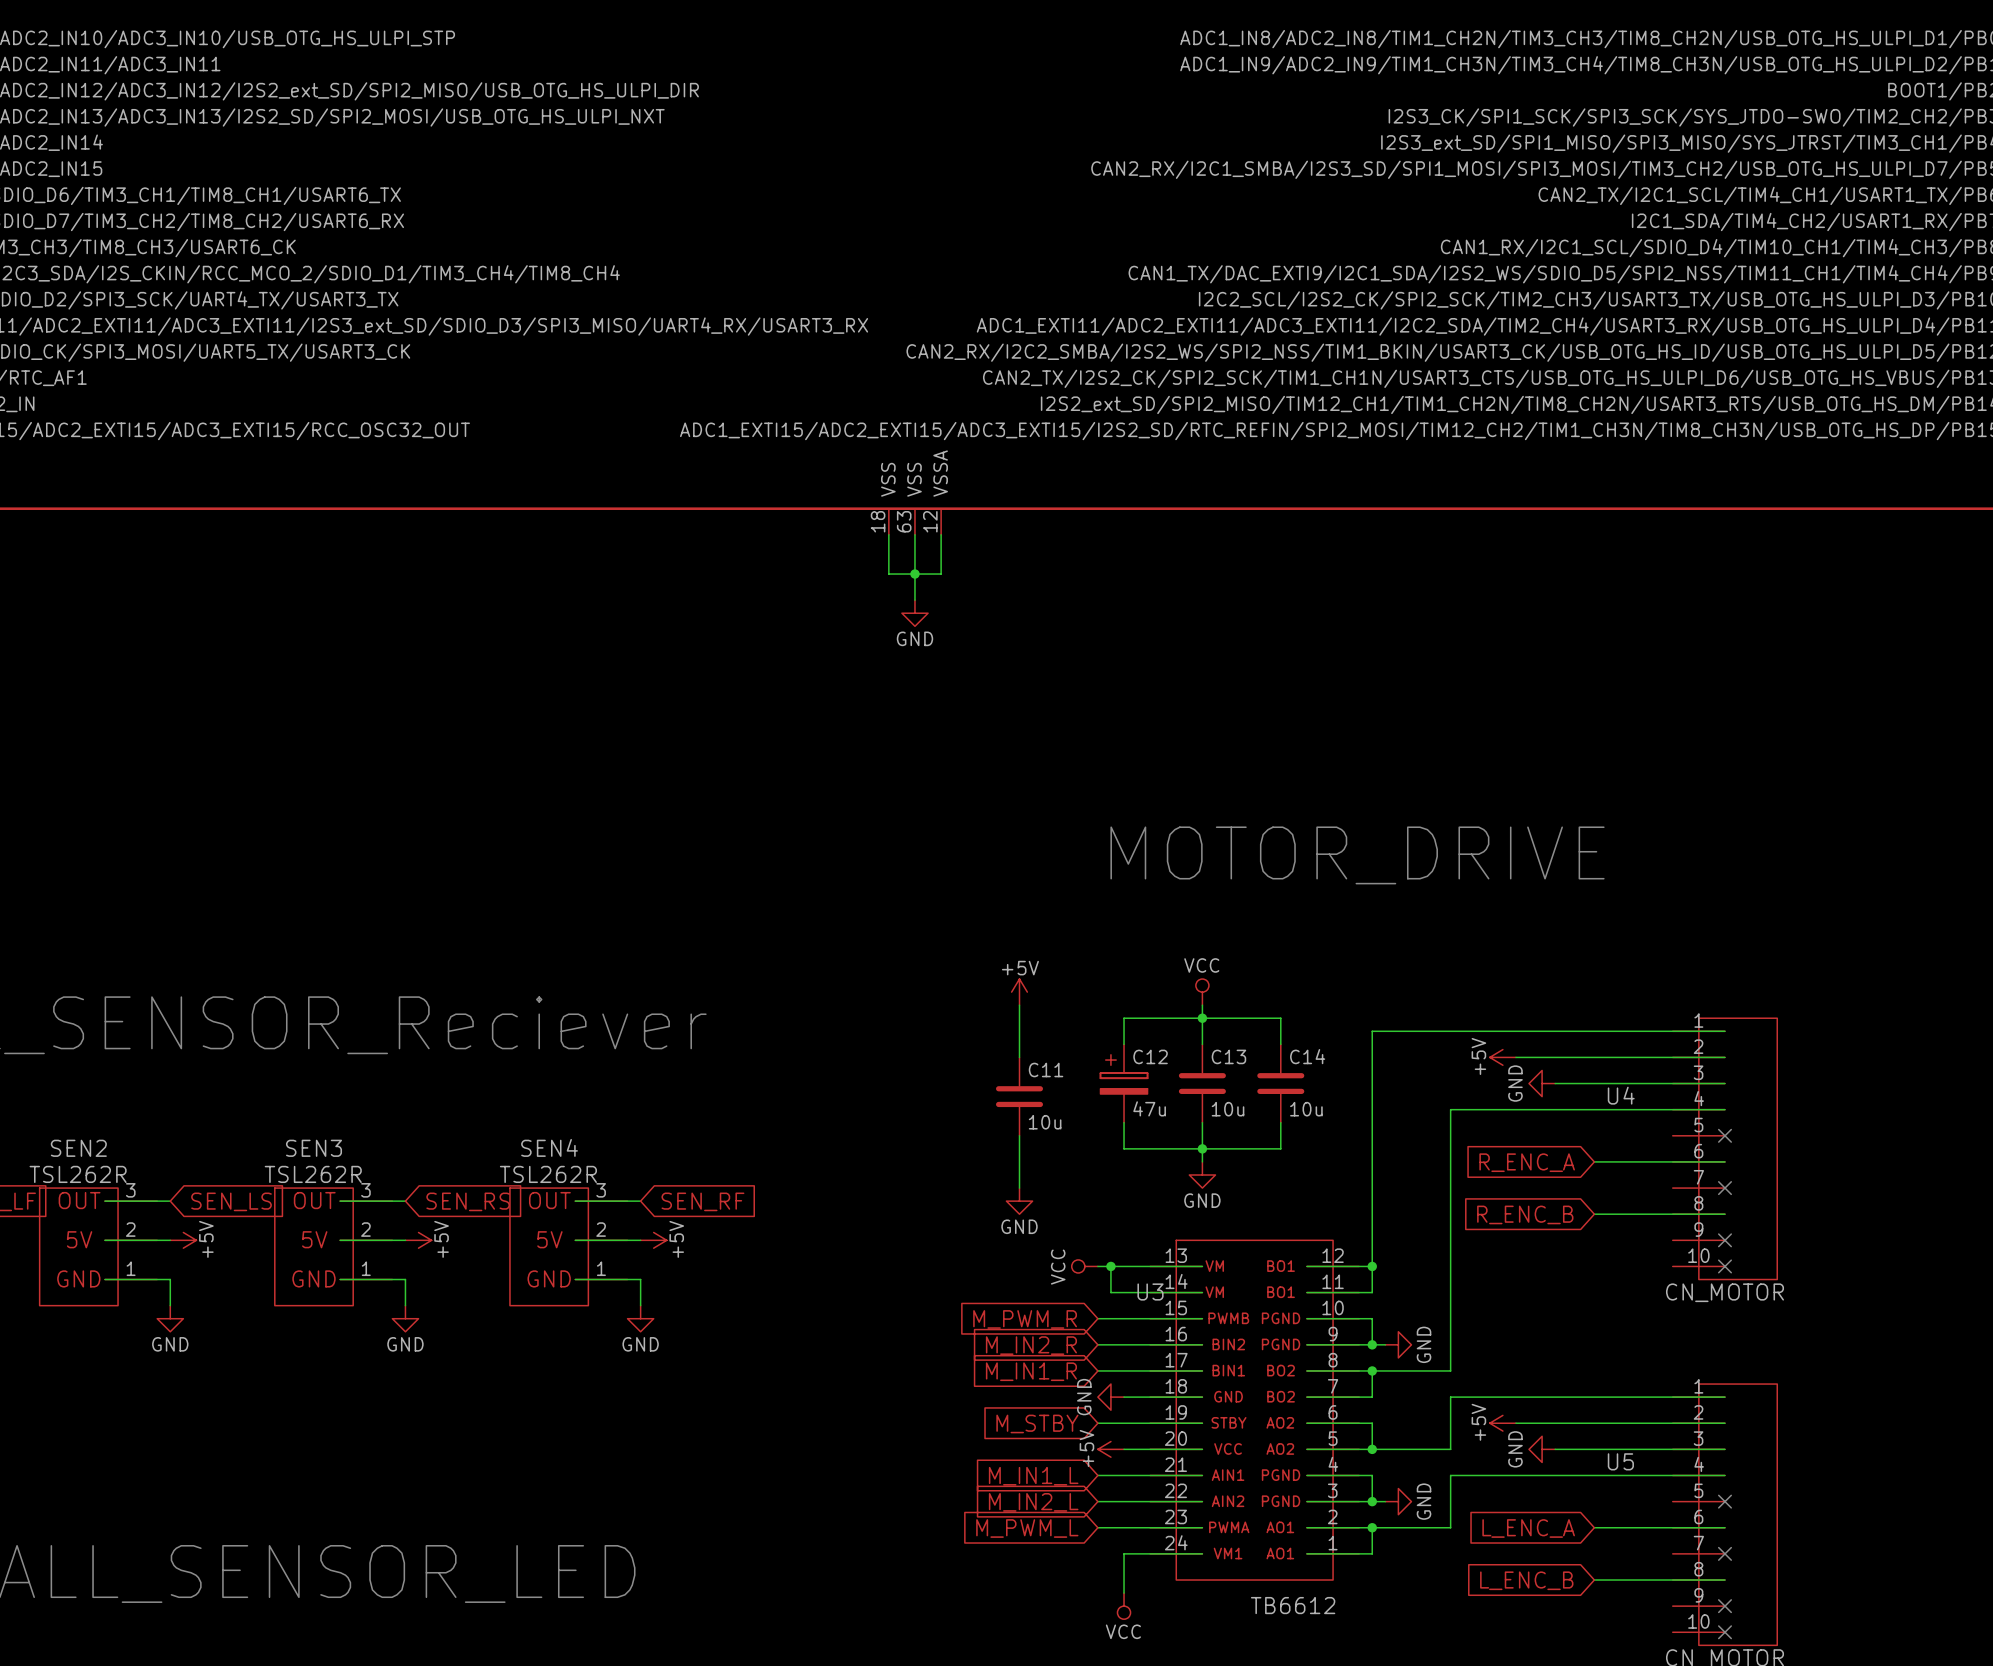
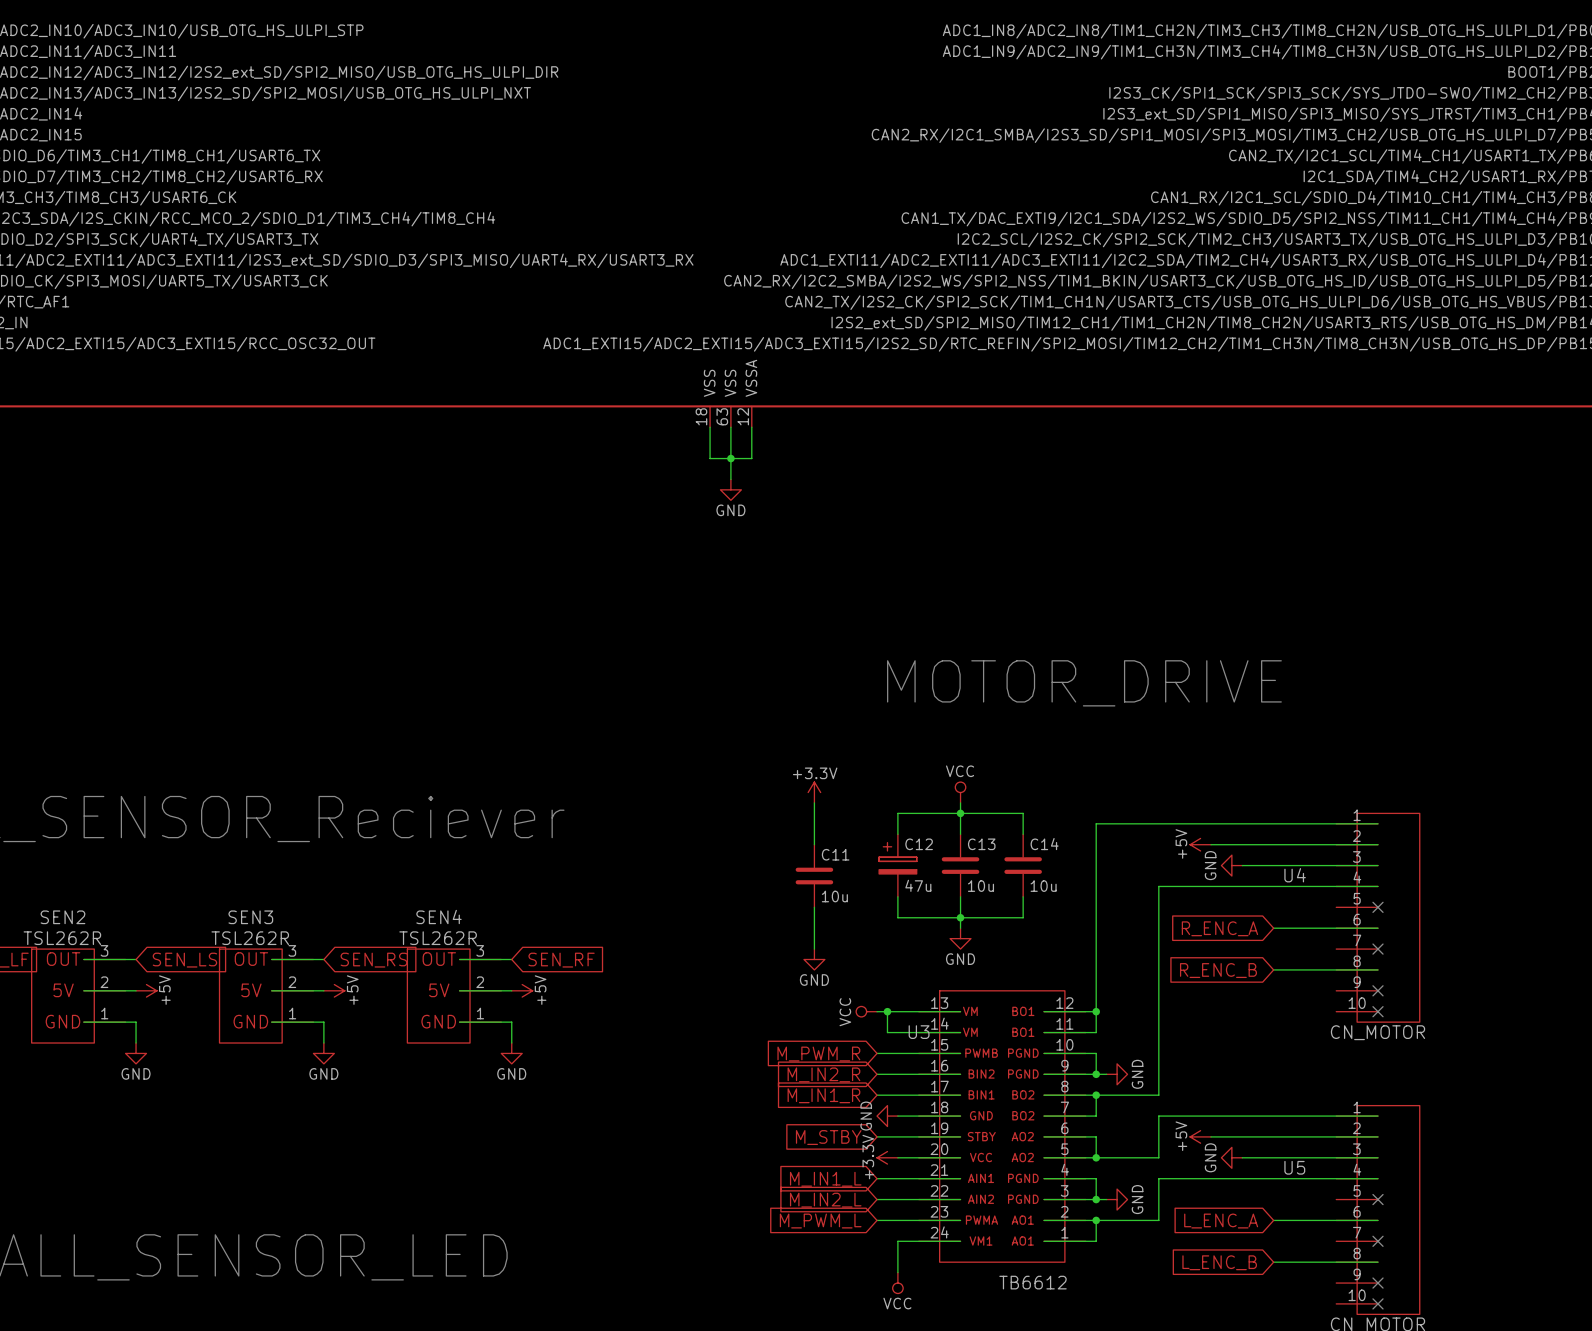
power symbol: +5V (1019, 992) -> +3.3V (814, 792)
power symbol: +5V (1110, 1449) -> +3.3V (887, 1157)

